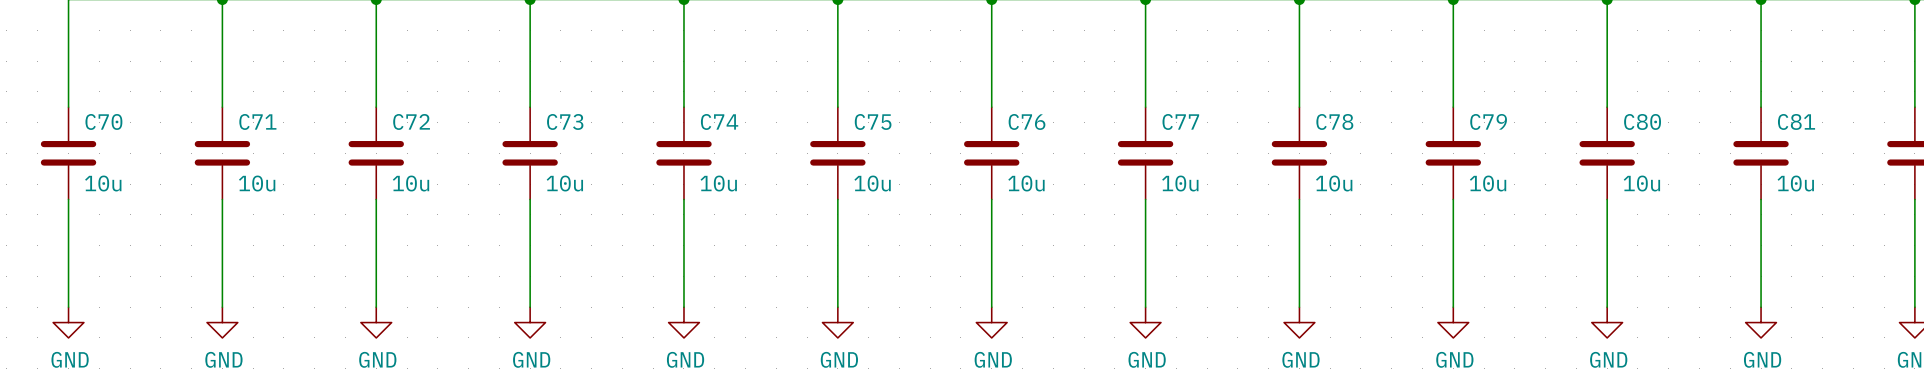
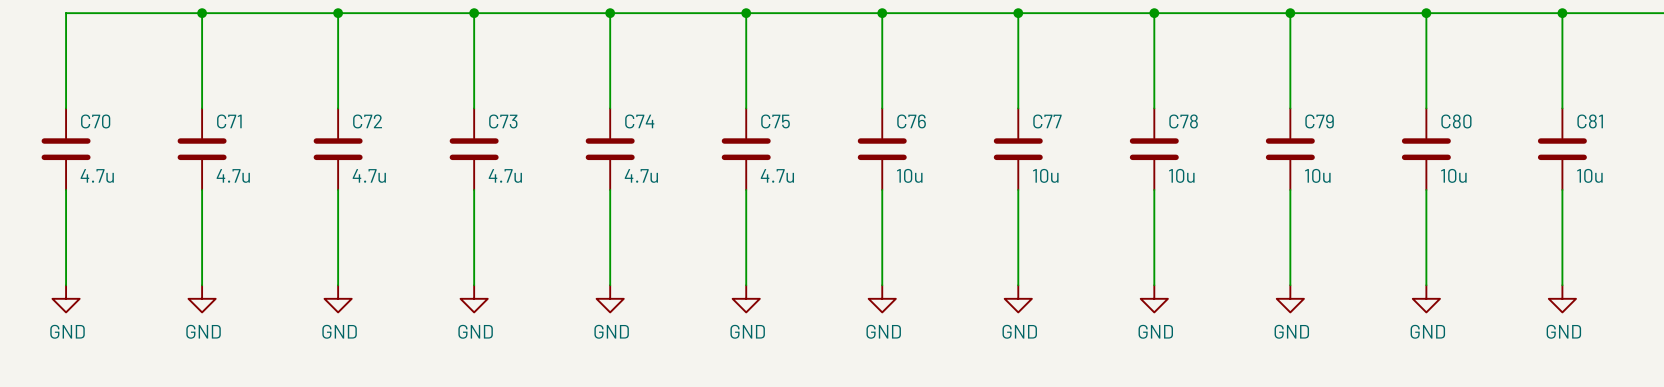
C70 value: 10u (103, 183) -> 4.7u (97, 175)
C71 value: 10u (257, 183) -> 4.7u (233, 175)
C72 value: 10u (410, 183) -> 4.7u (369, 175)
C73 value: 10u (564, 183) -> 4.7u (505, 175)
C74 value: 10u (718, 183) -> 4.7u (641, 175)
C75 value: 10u (872, 183) -> 4.7u (777, 175)

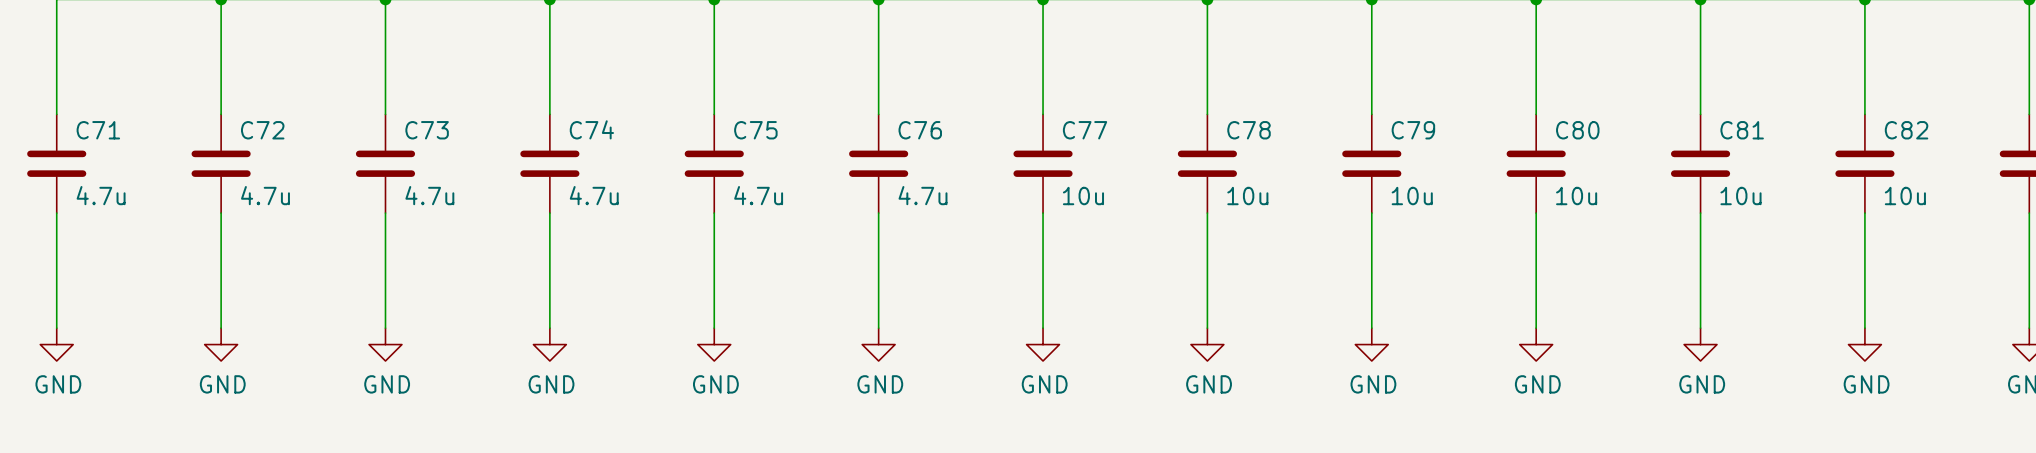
C70 name: C70 (95, 121) -> C71 (98, 130)
C71 name: C71 (229, 121) -> C72 (262, 130)
C72 name: C72 (367, 121) -> C73 (427, 130)
C73 name: C73 (503, 121) -> C74 (591, 129)
C74 name: C74 (639, 121) -> C75 (755, 130)
C75 name: C75 (775, 121) -> C76 (920, 130)
C76 name: C76 (911, 121) -> C77 (1085, 130)
C77 name: C77 (1047, 121) -> C78 (1249, 130)
C78 name: C78 (1183, 121) -> C79 (1413, 130)
C79 name: C79 (1319, 121) -> C80 (1577, 130)
C80 name: C80 (1456, 121) -> C81 (1742, 130)
C81 name: C81 (1590, 121) -> C82 (1906, 130)

